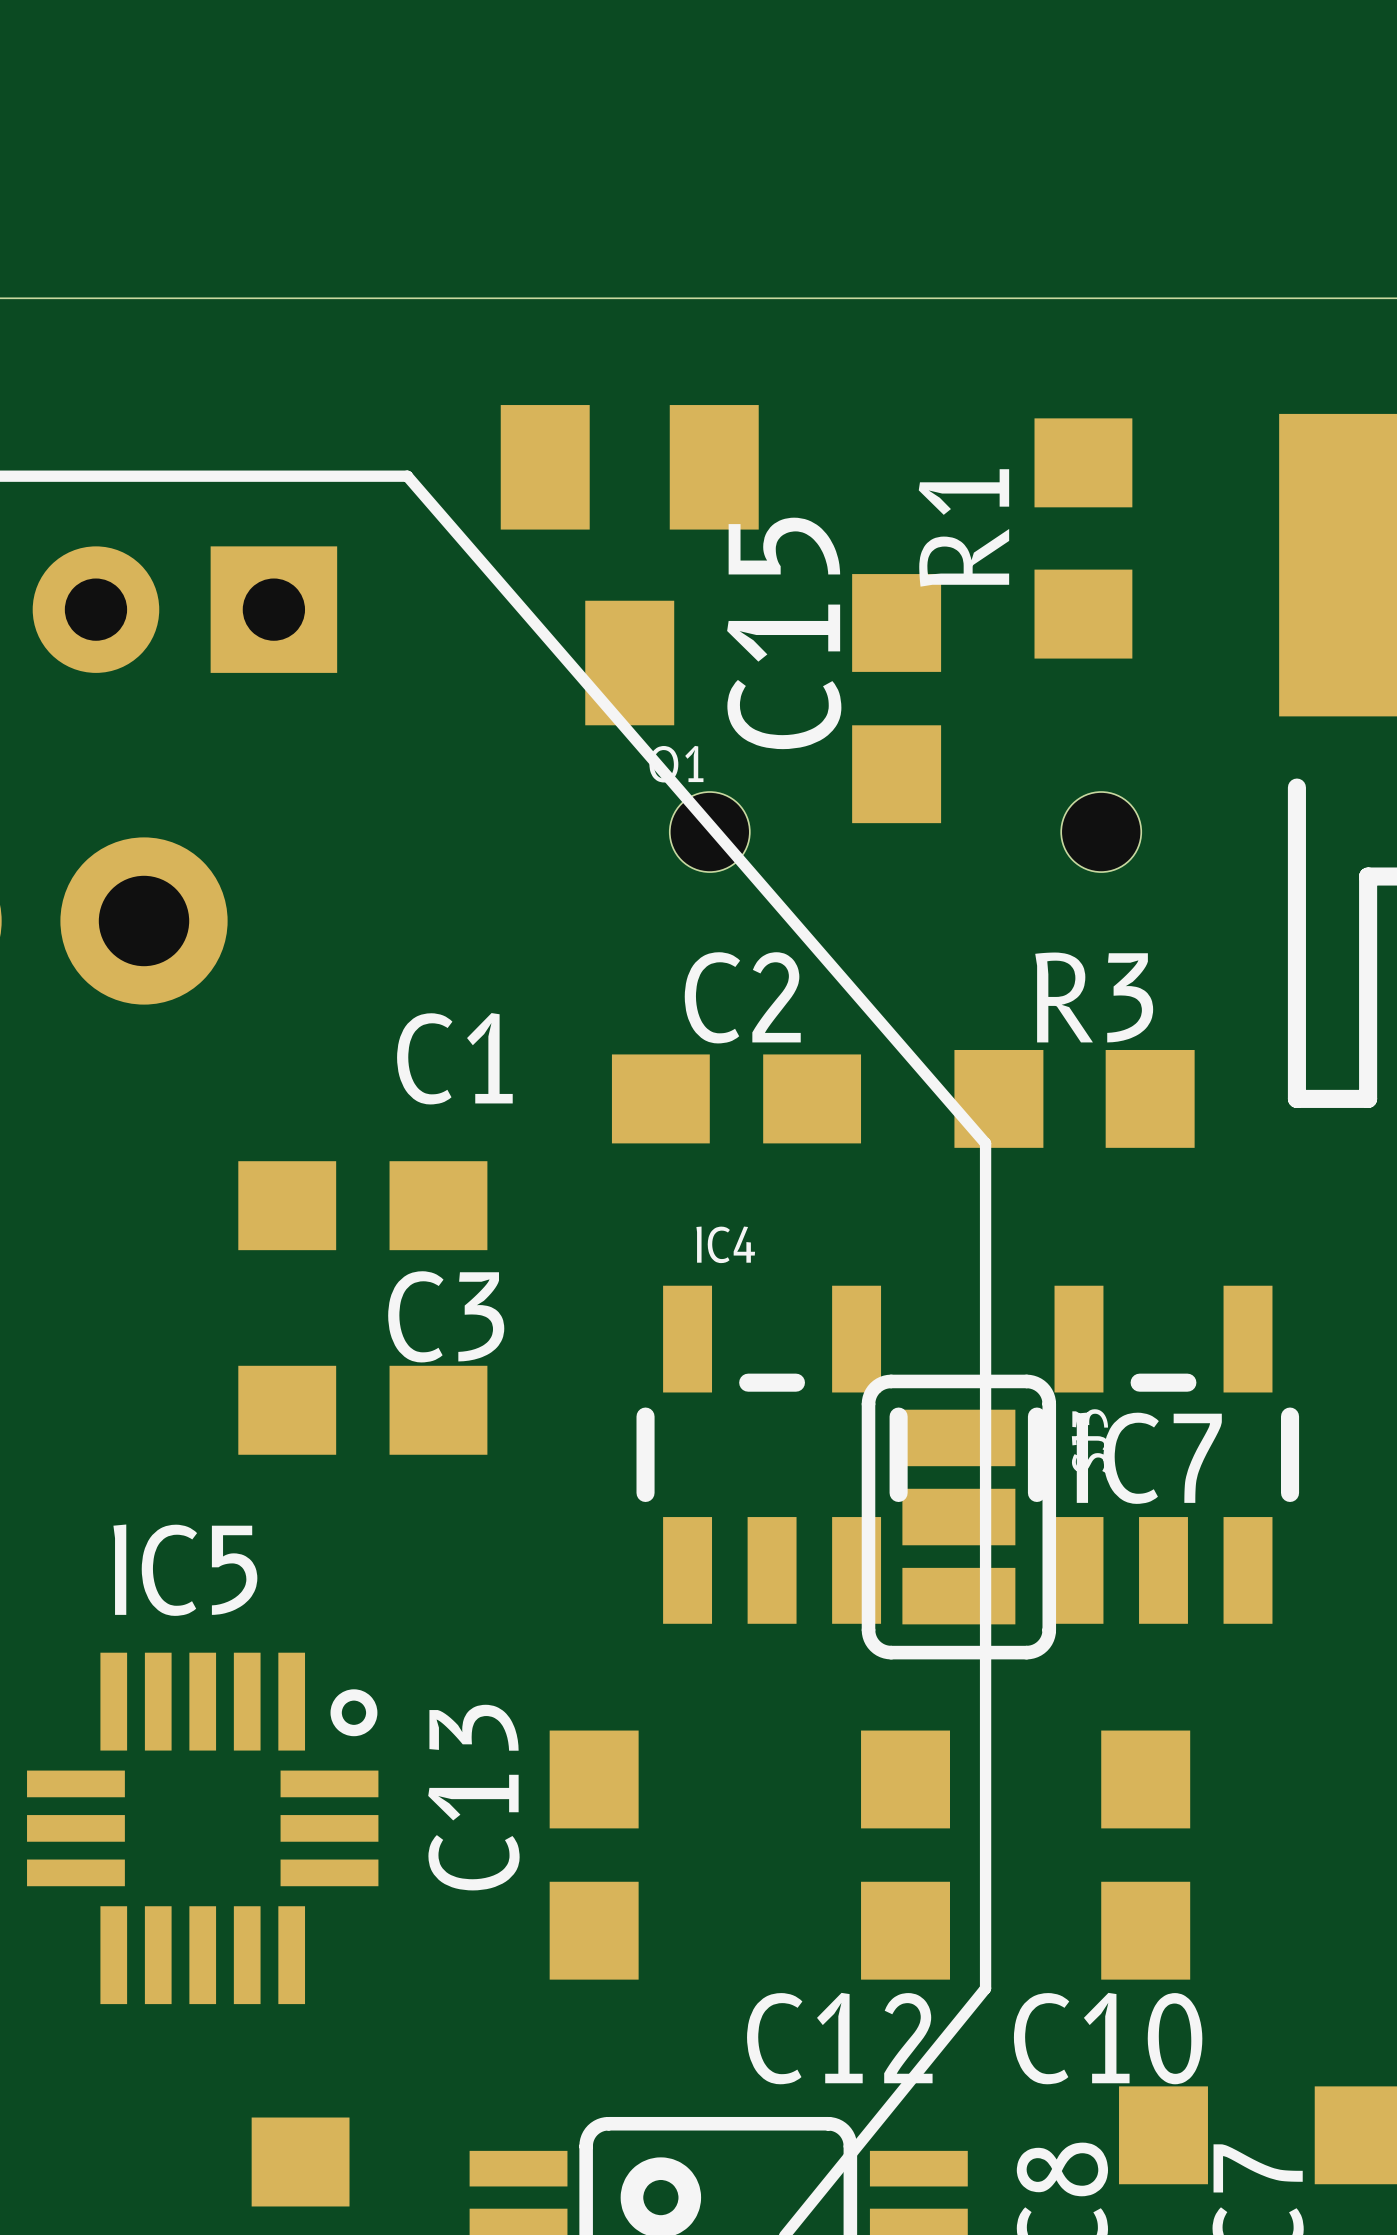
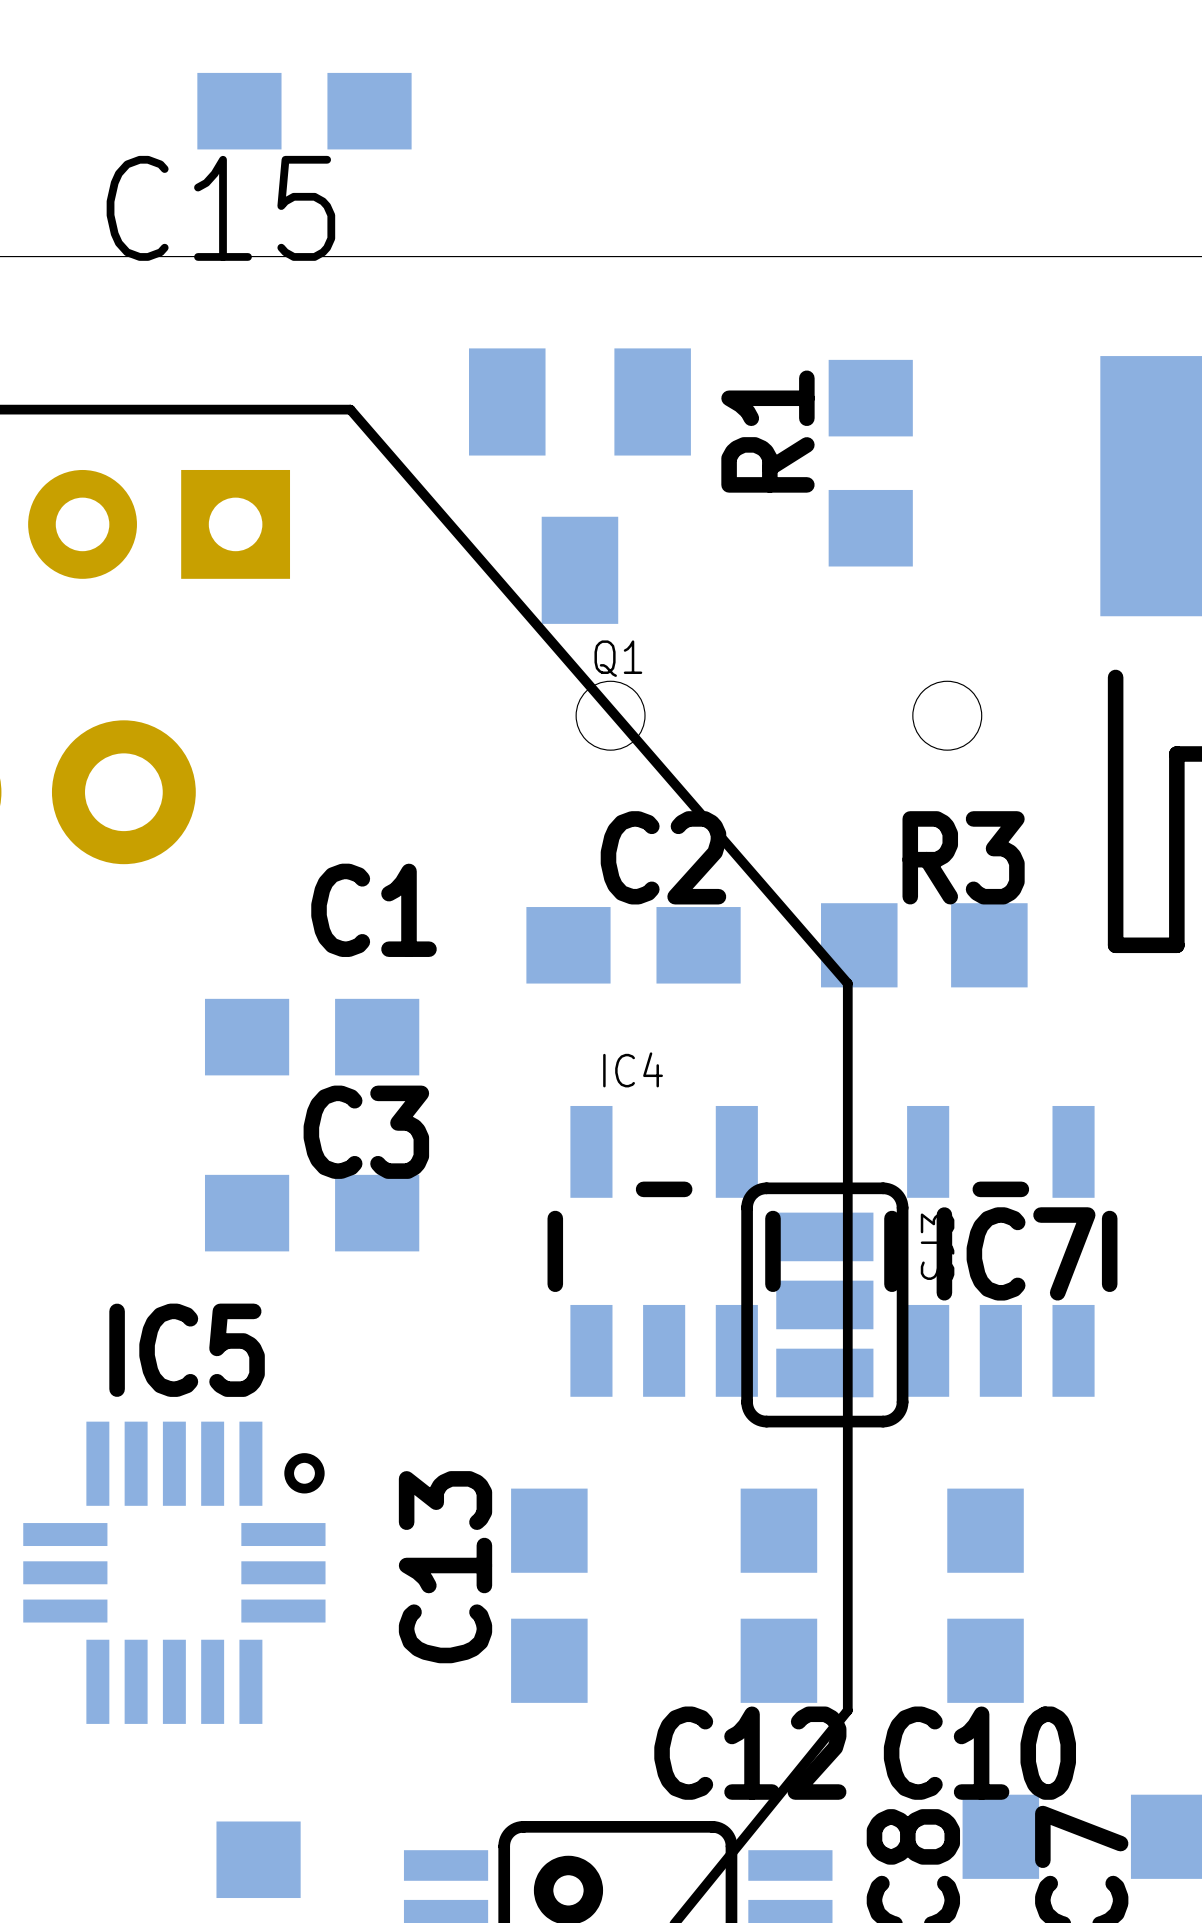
R1 position: (1083, 538) -> (870, 463)
Q1 position: (629, 565) -> (579, 486)
C15 name position: C15 (784, 633) -> C15 (220, 208)
C15 rotation: 0° (896, 698) -> 90° clockwise (304, 111)
C15 position: (896, 698) -> (304, 111)
C13 position: (594, 1855) -> (549, 1595)

